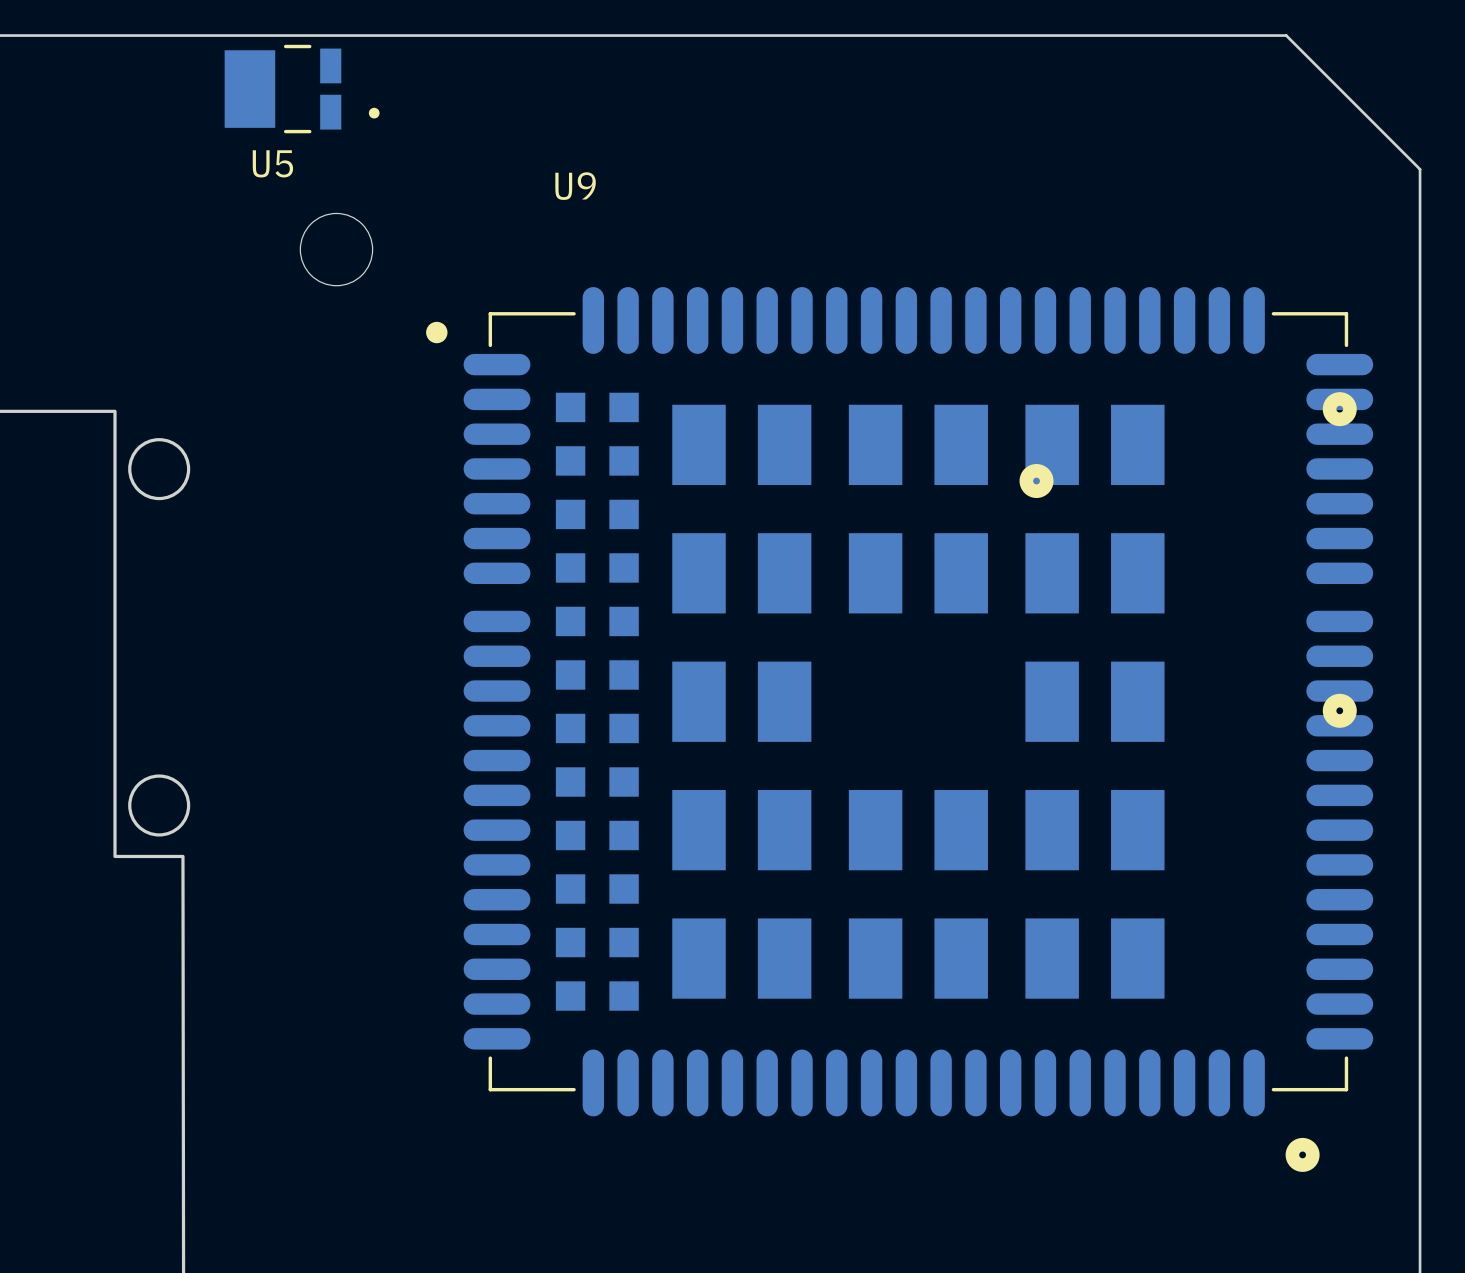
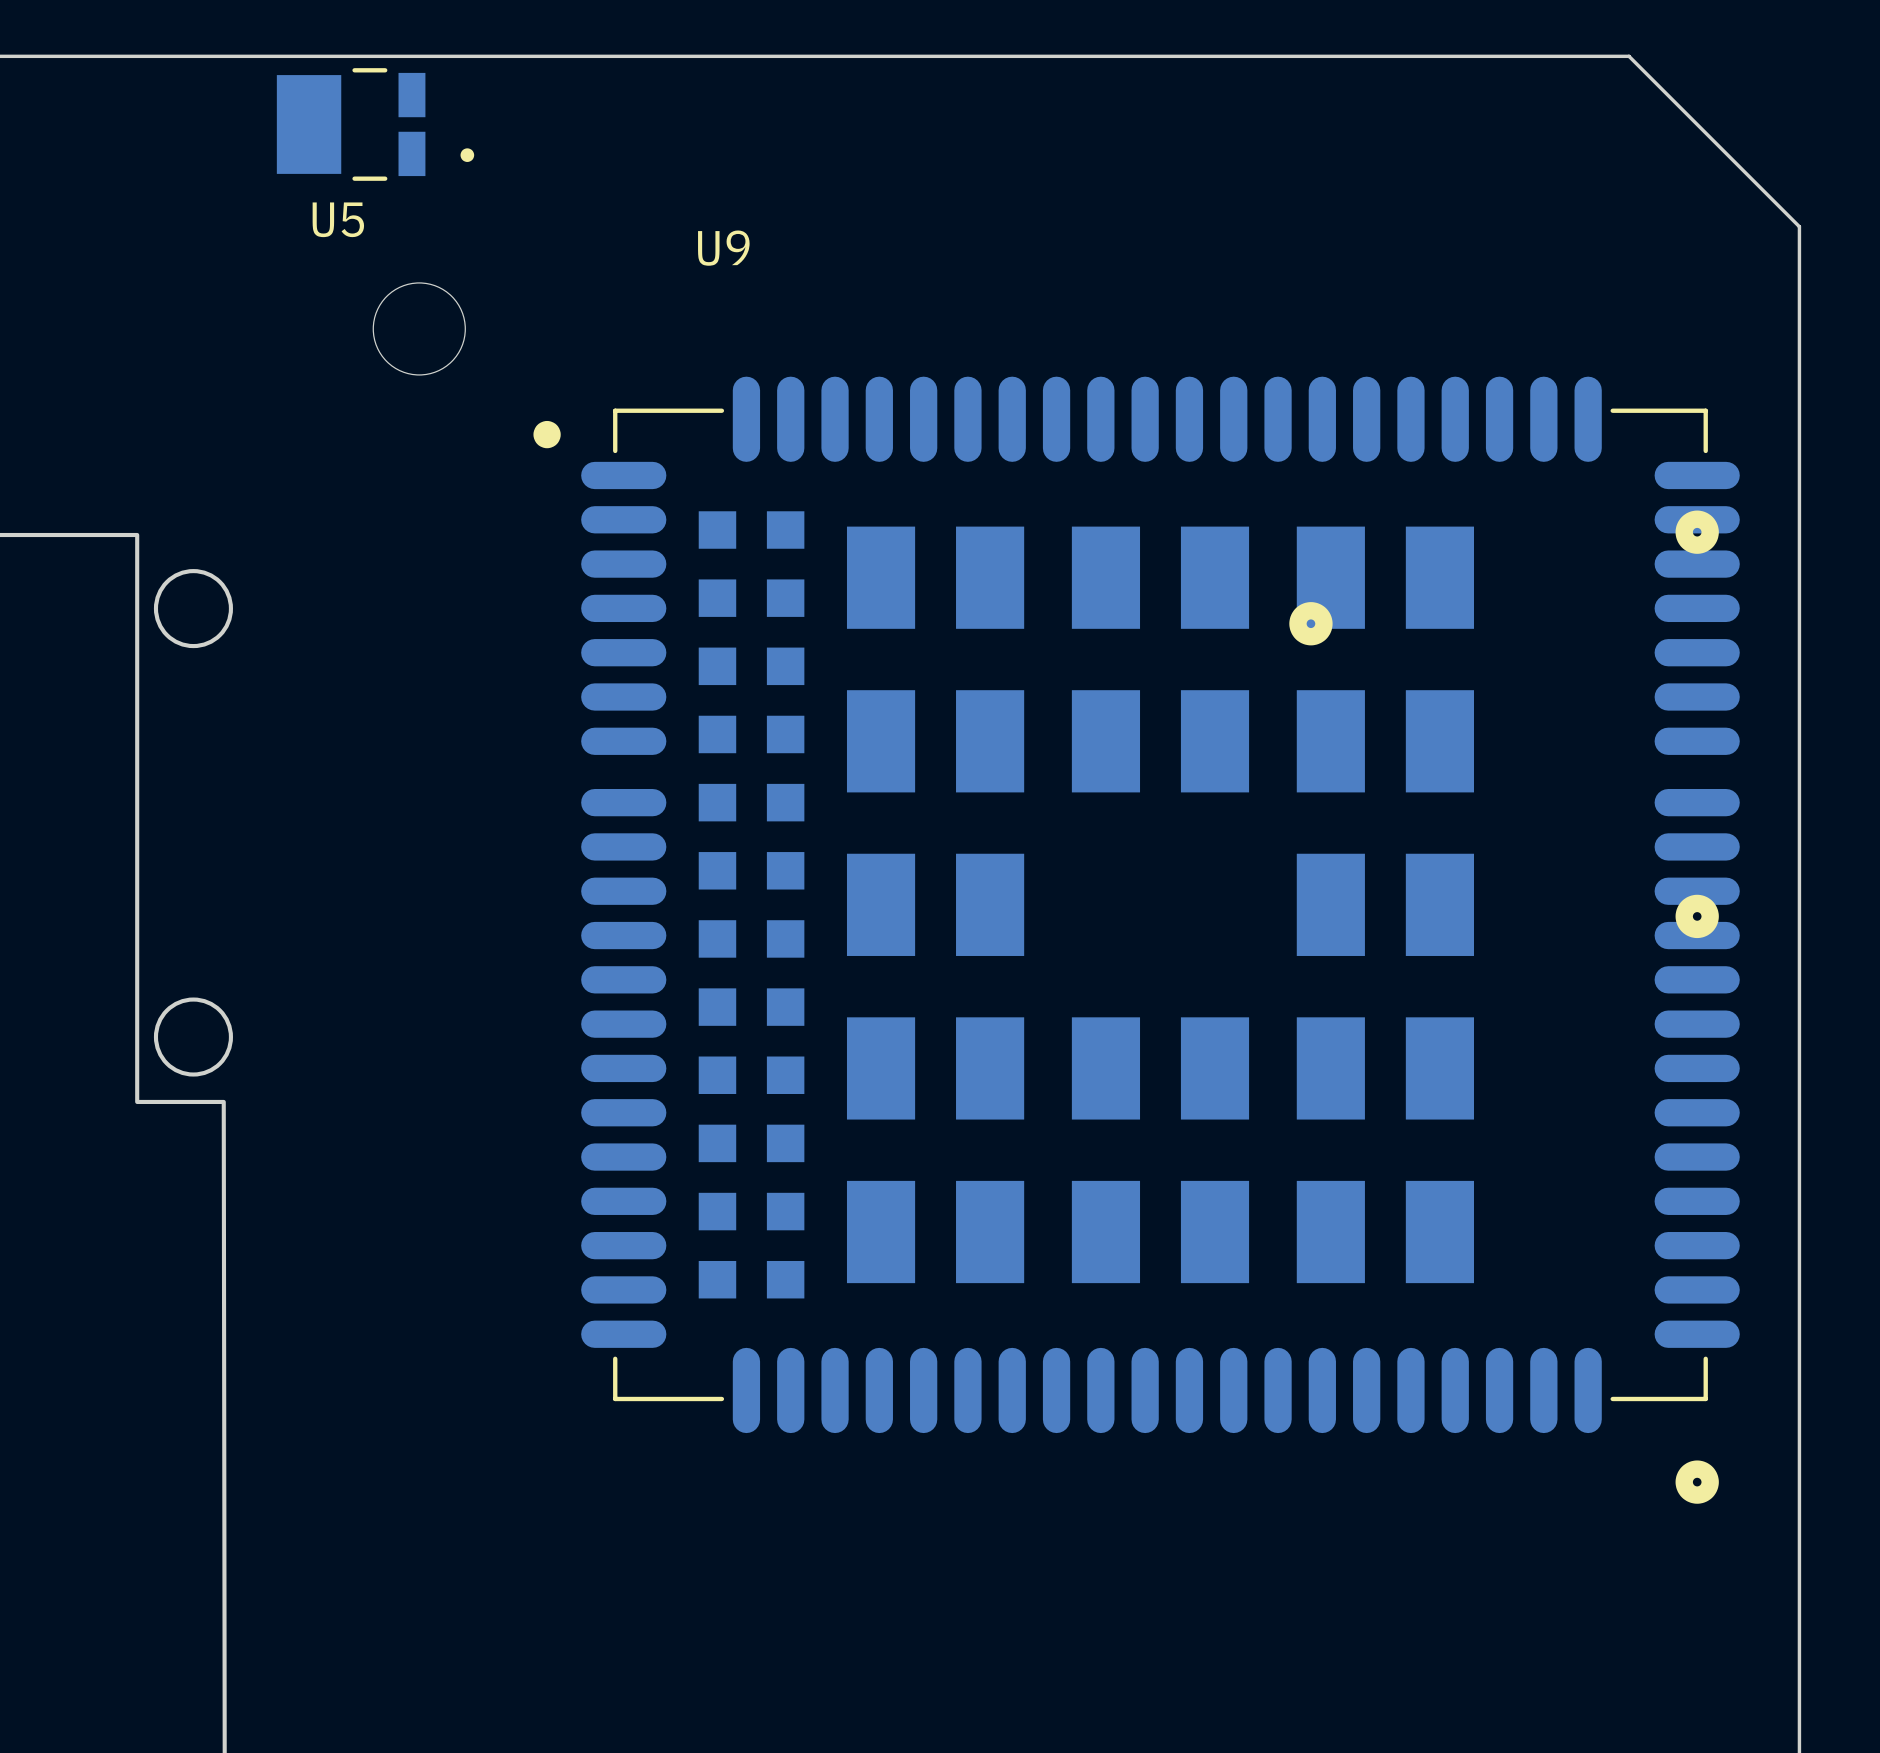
part position: (1302, 1154) -> (1697, 1482)

